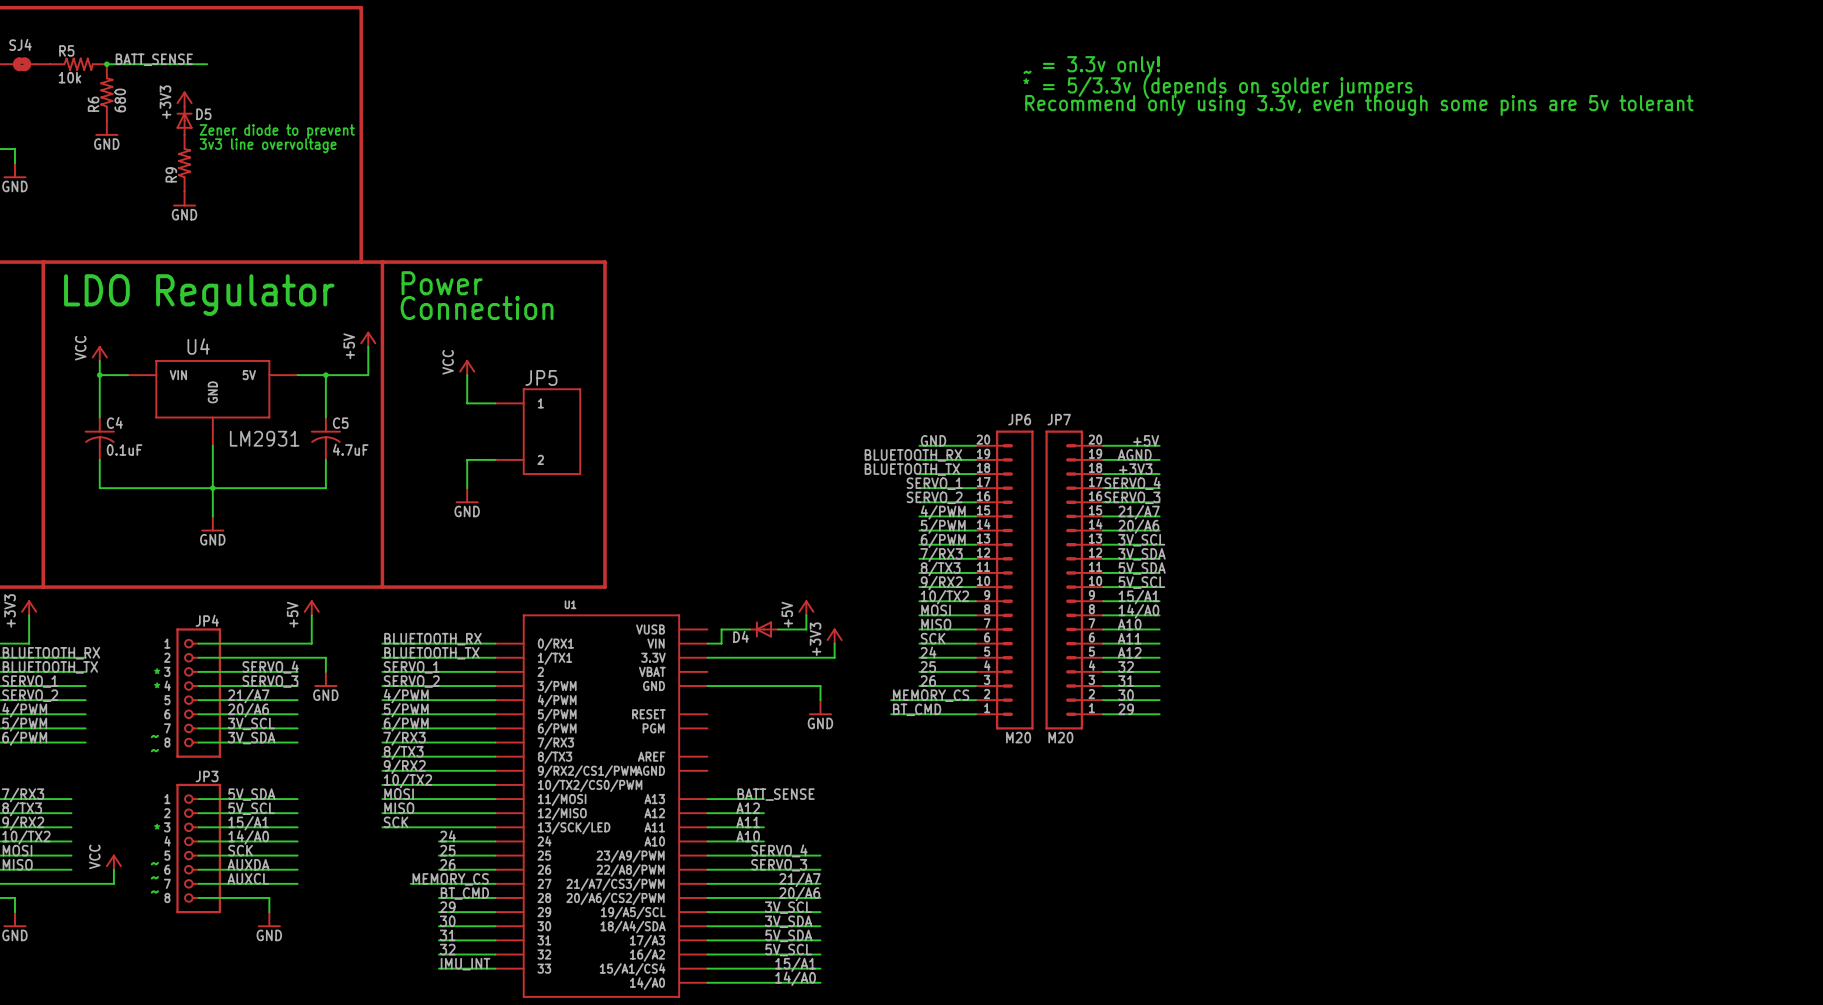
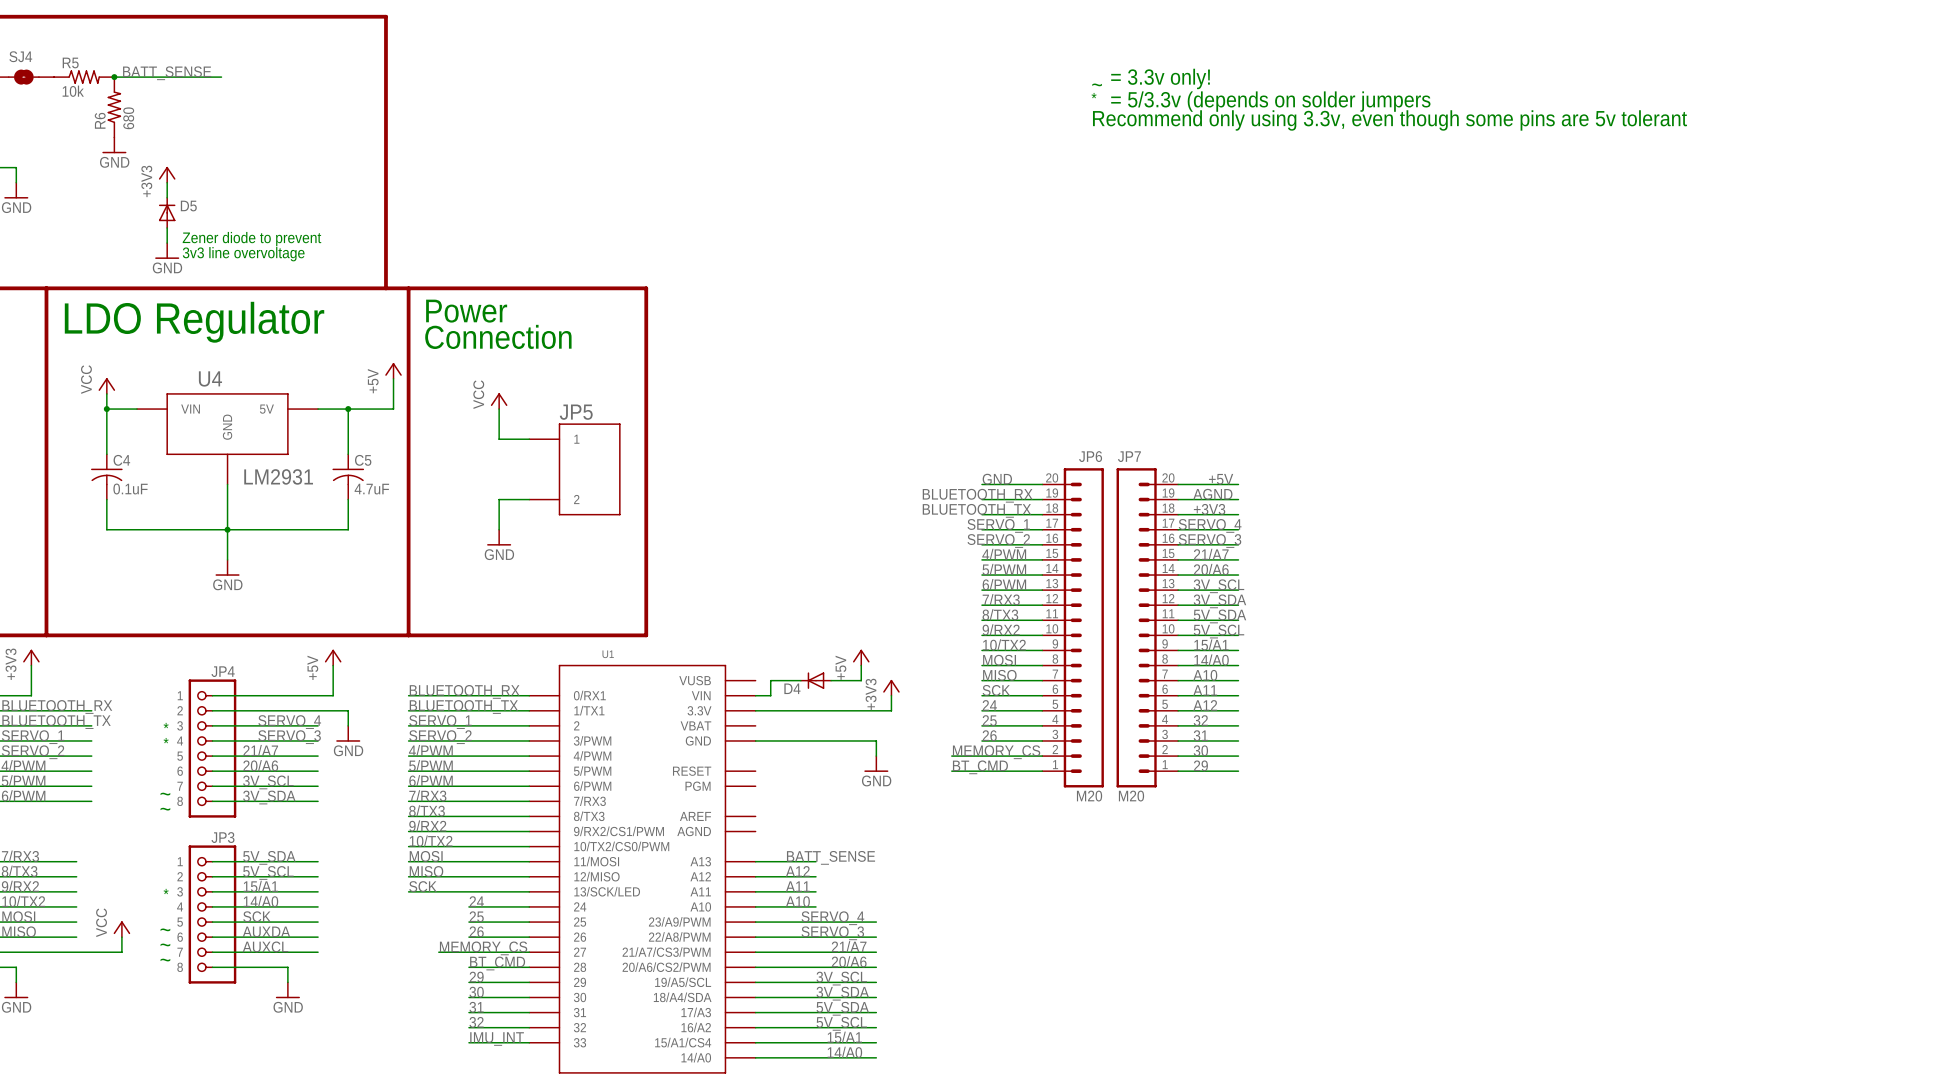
power symbol position: +3V3 (184, 99) -> +3V3 (167, 174)
D5 position: (184, 120) -> (167, 212)
text position: Zener diode to prevent (277, 131) -> Zener diode to prevent (251, 239)
text position: 3v3 line overvoltage (268, 145) -> 3v3 line overvoltage (243, 254)
wire: none -> (167, 182) (167, 197)
R9: (184, 163) -> none
power symbol position: GND (184, 198) -> GND (167, 250)
wire: none -> (167, 227) (167, 243)

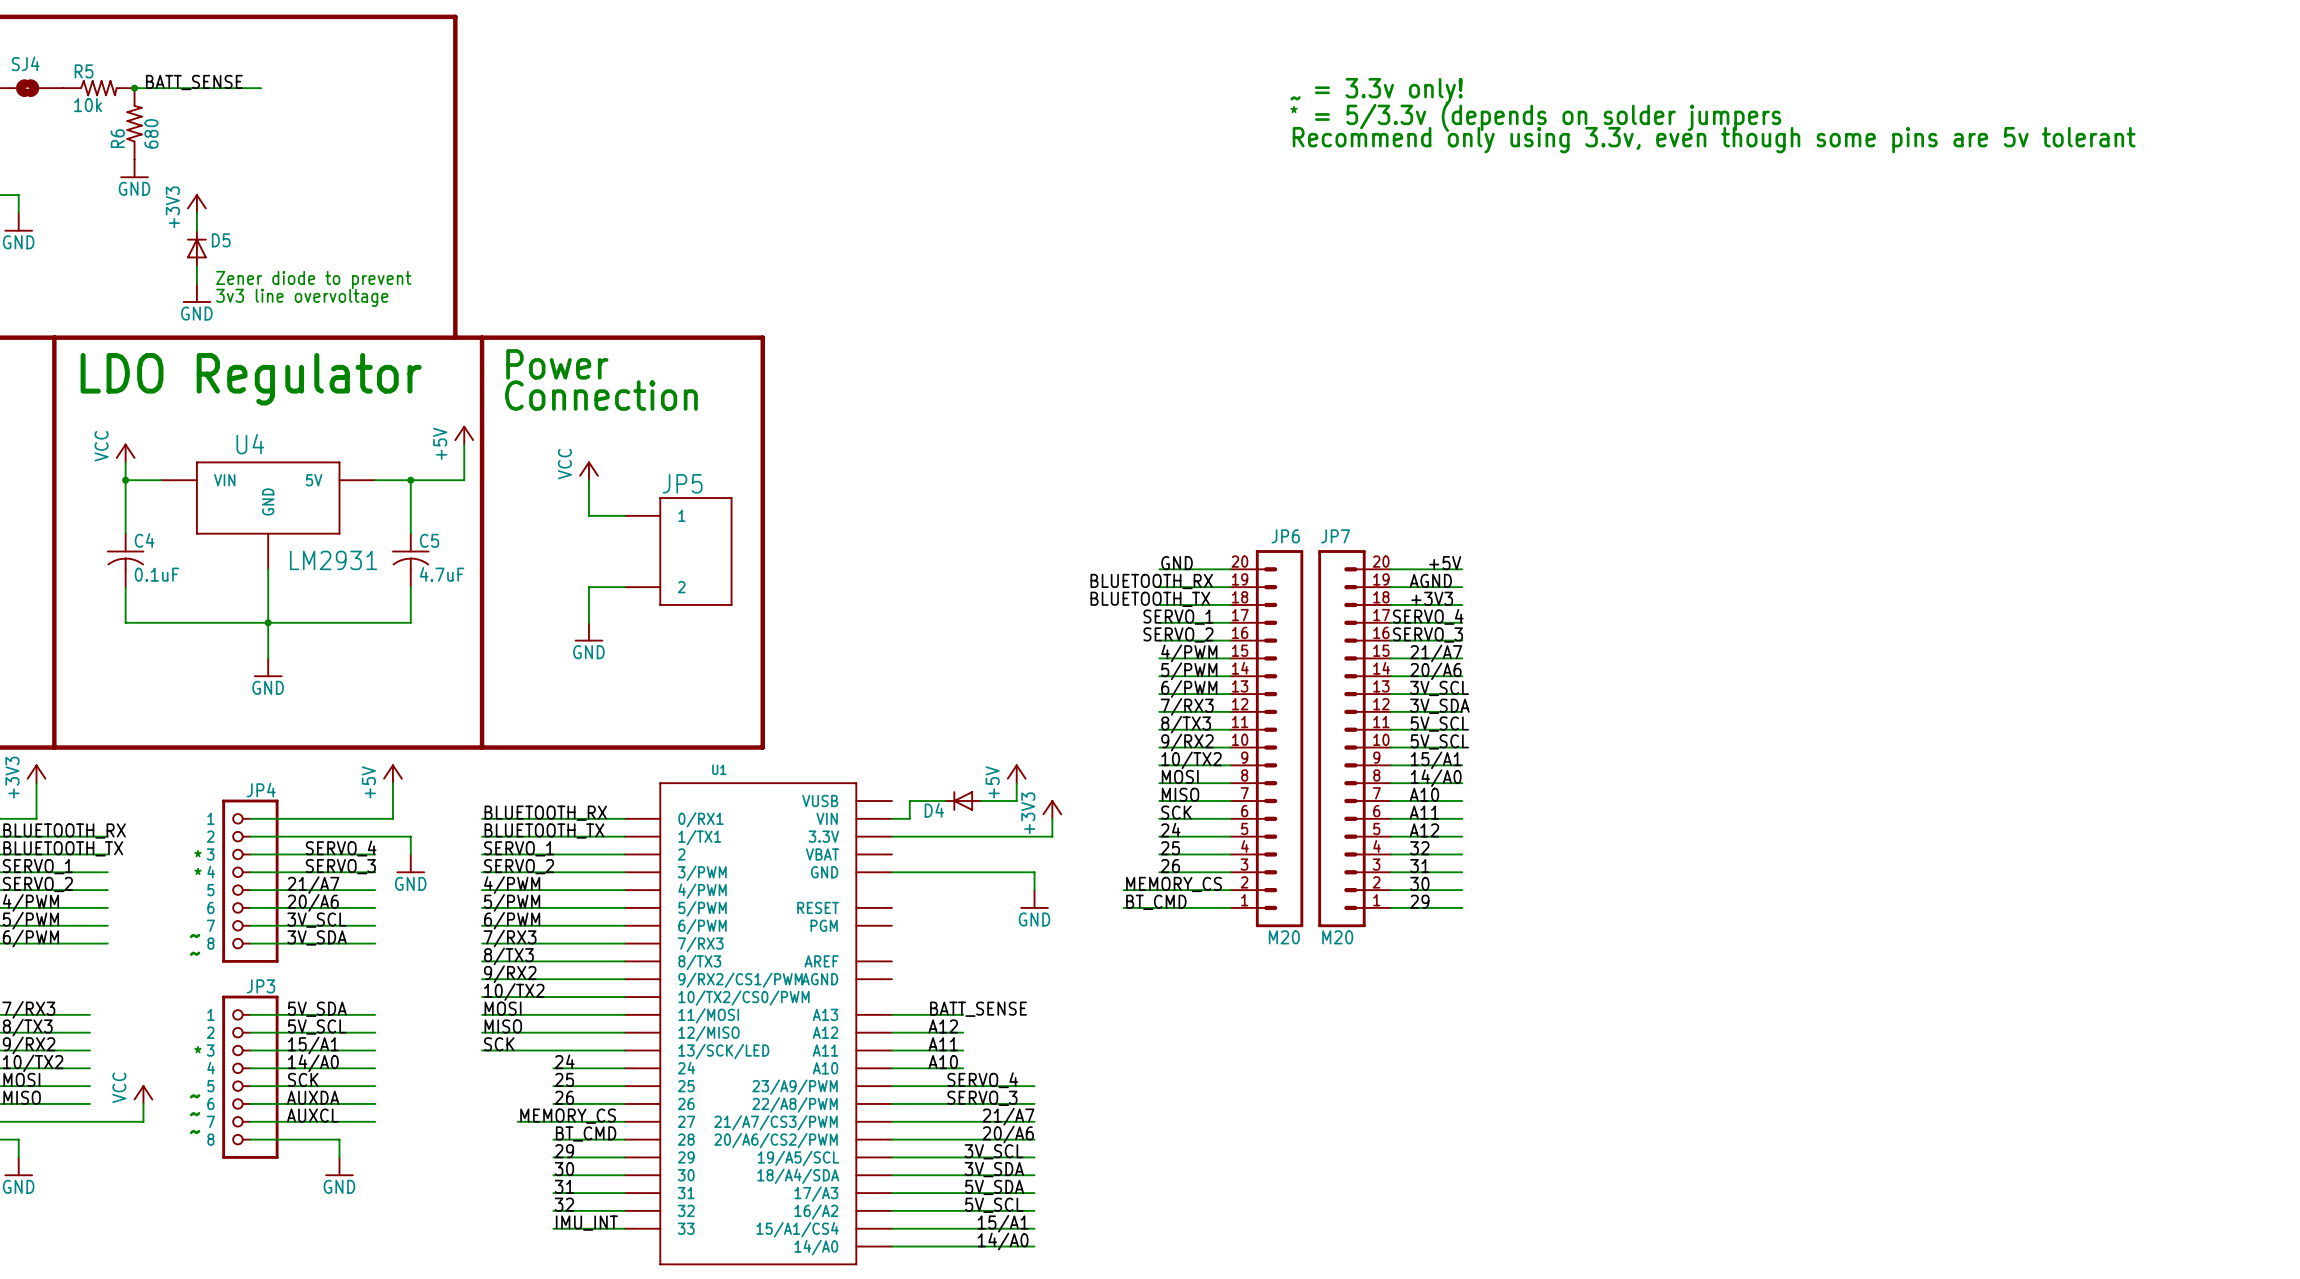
label: 5V_SDA (1219, 616) -> 5V_SCL (1439, 724)

